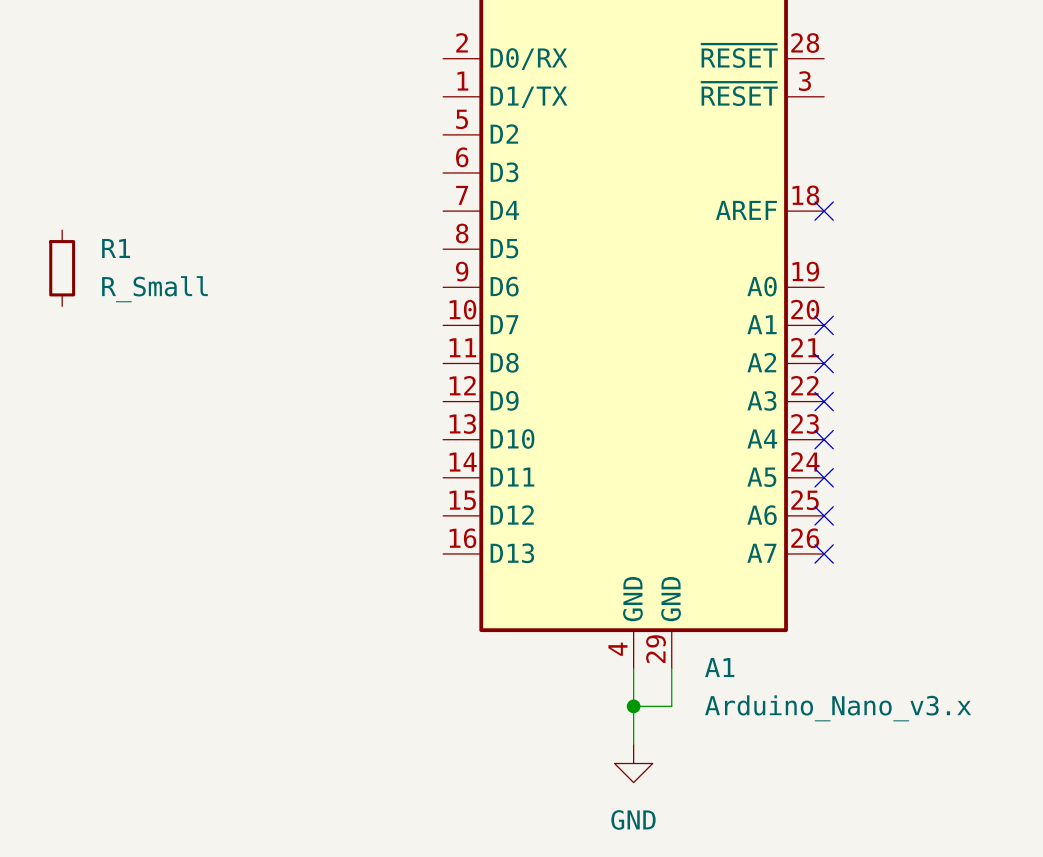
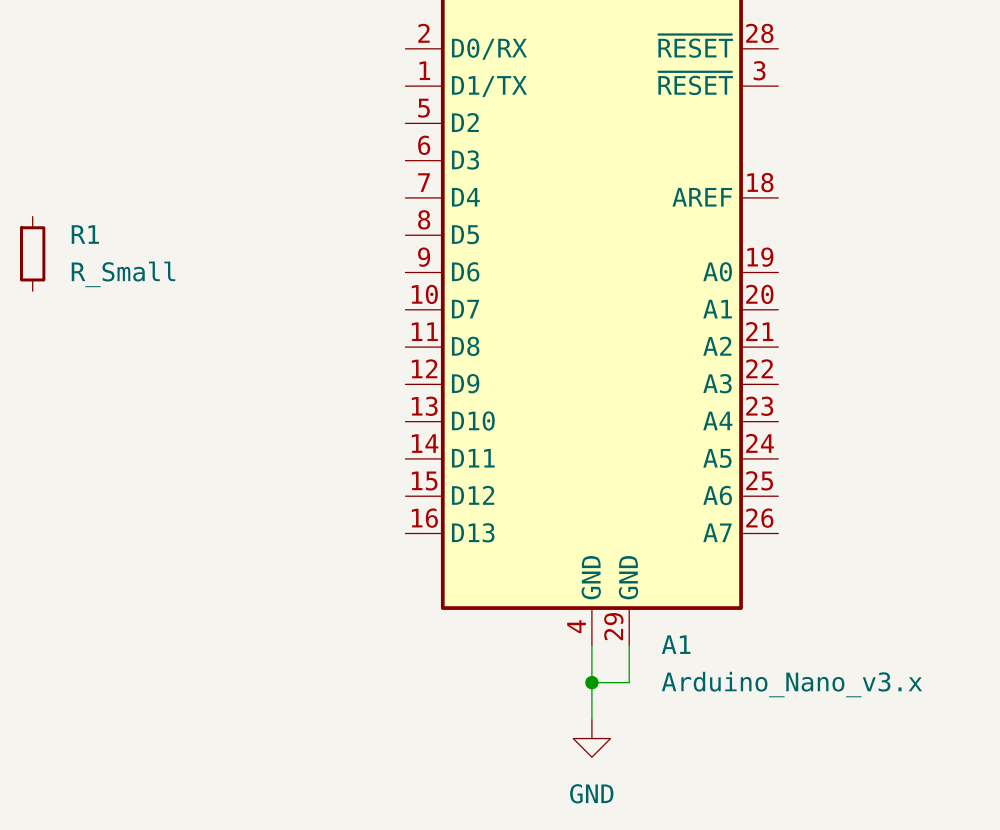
no-connect mark: (824, 211) -> none
no-connect mark: (824, 325) -> none
no-connect mark: (824, 363) -> none
no-connect mark: (824, 401) -> none
no-connect mark: (824, 439) -> none
no-connect mark: (824, 477) -> none
no-connect mark: (824, 515) -> none
no-connect mark: (824, 553) -> none

